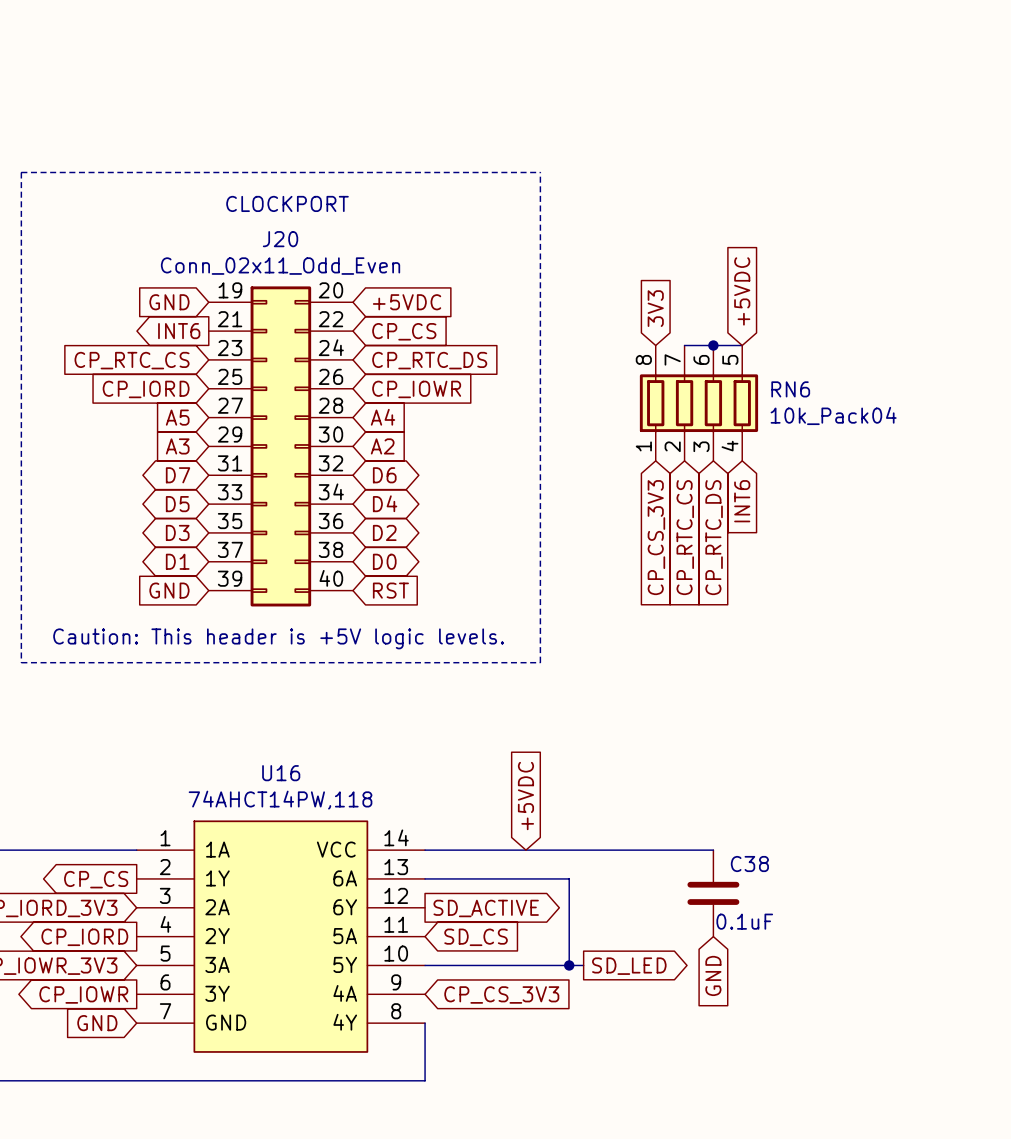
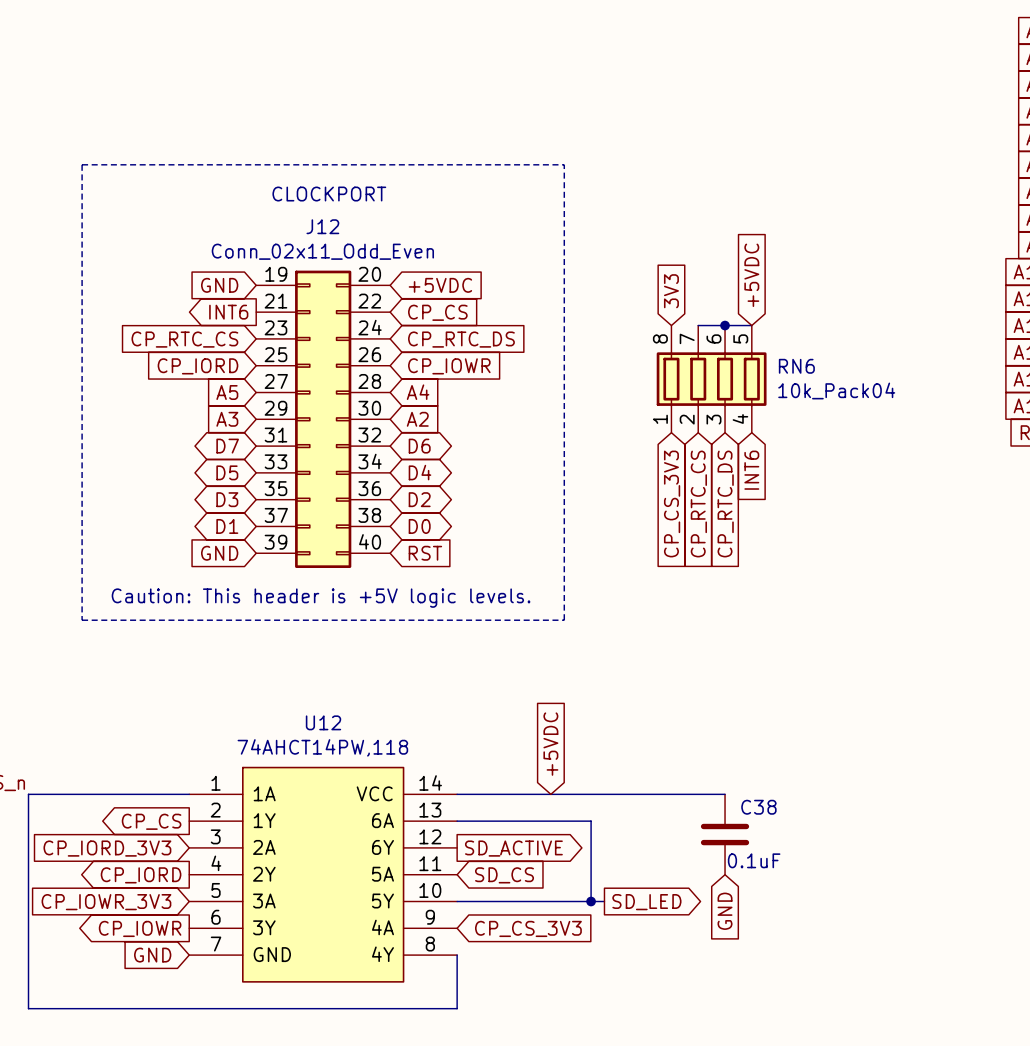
J20 name: J20 (280, 239) -> J12 (322, 226)
U16 name: U16 (281, 773) -> U12 (323, 722)

